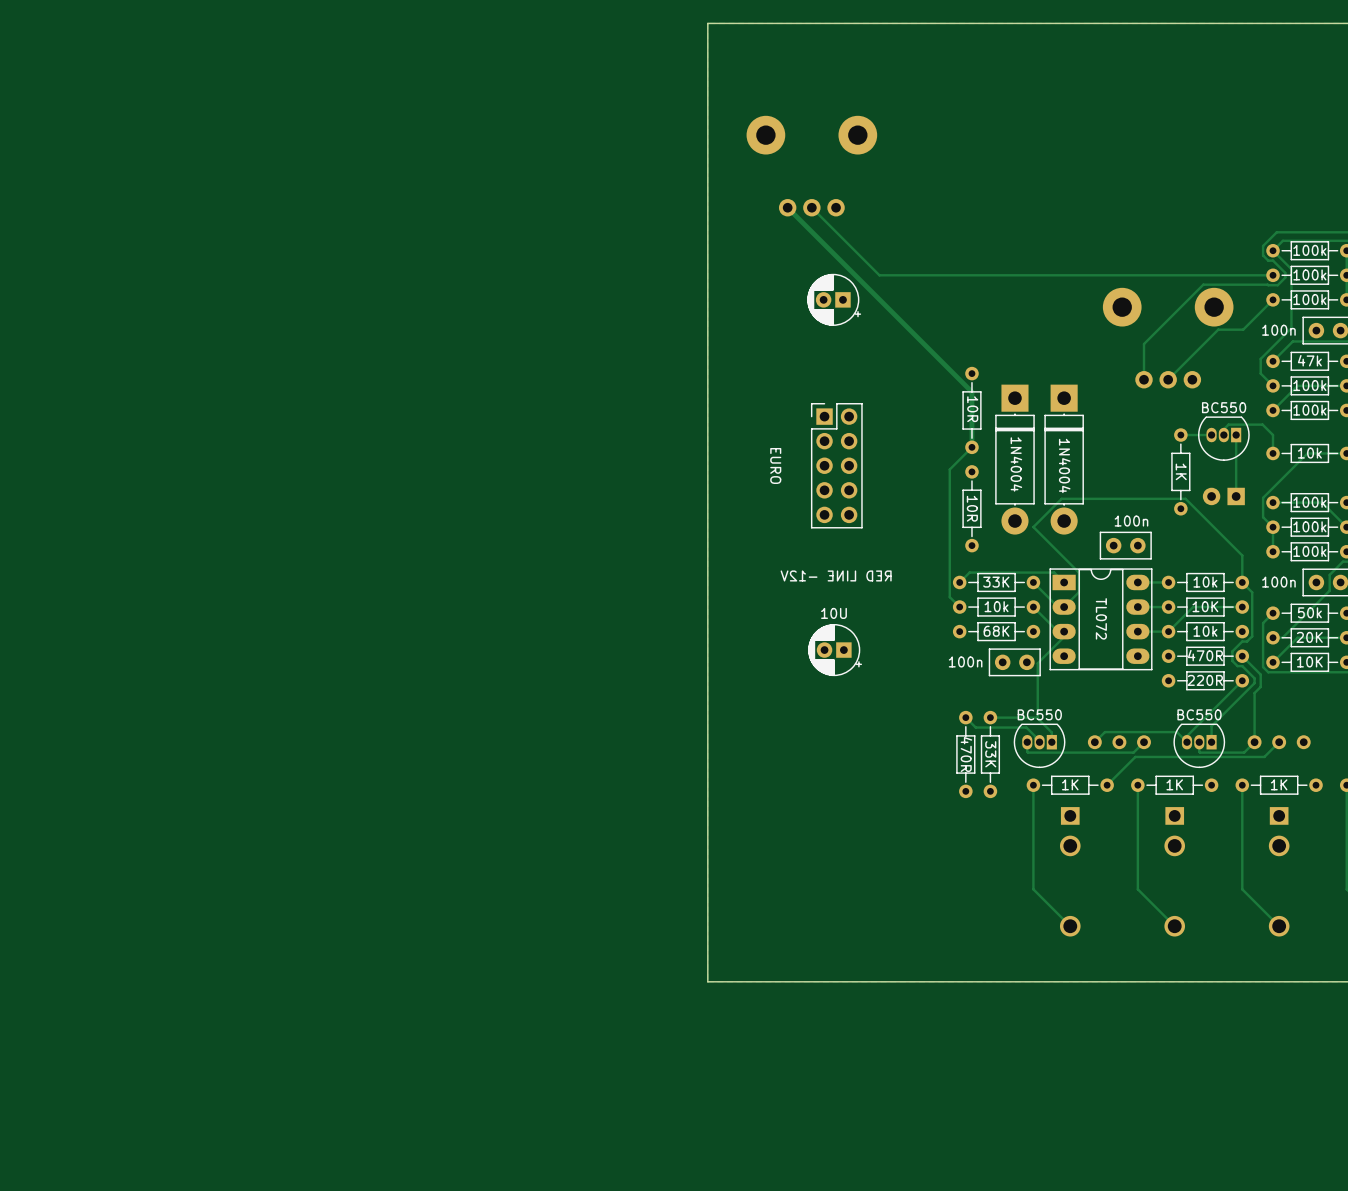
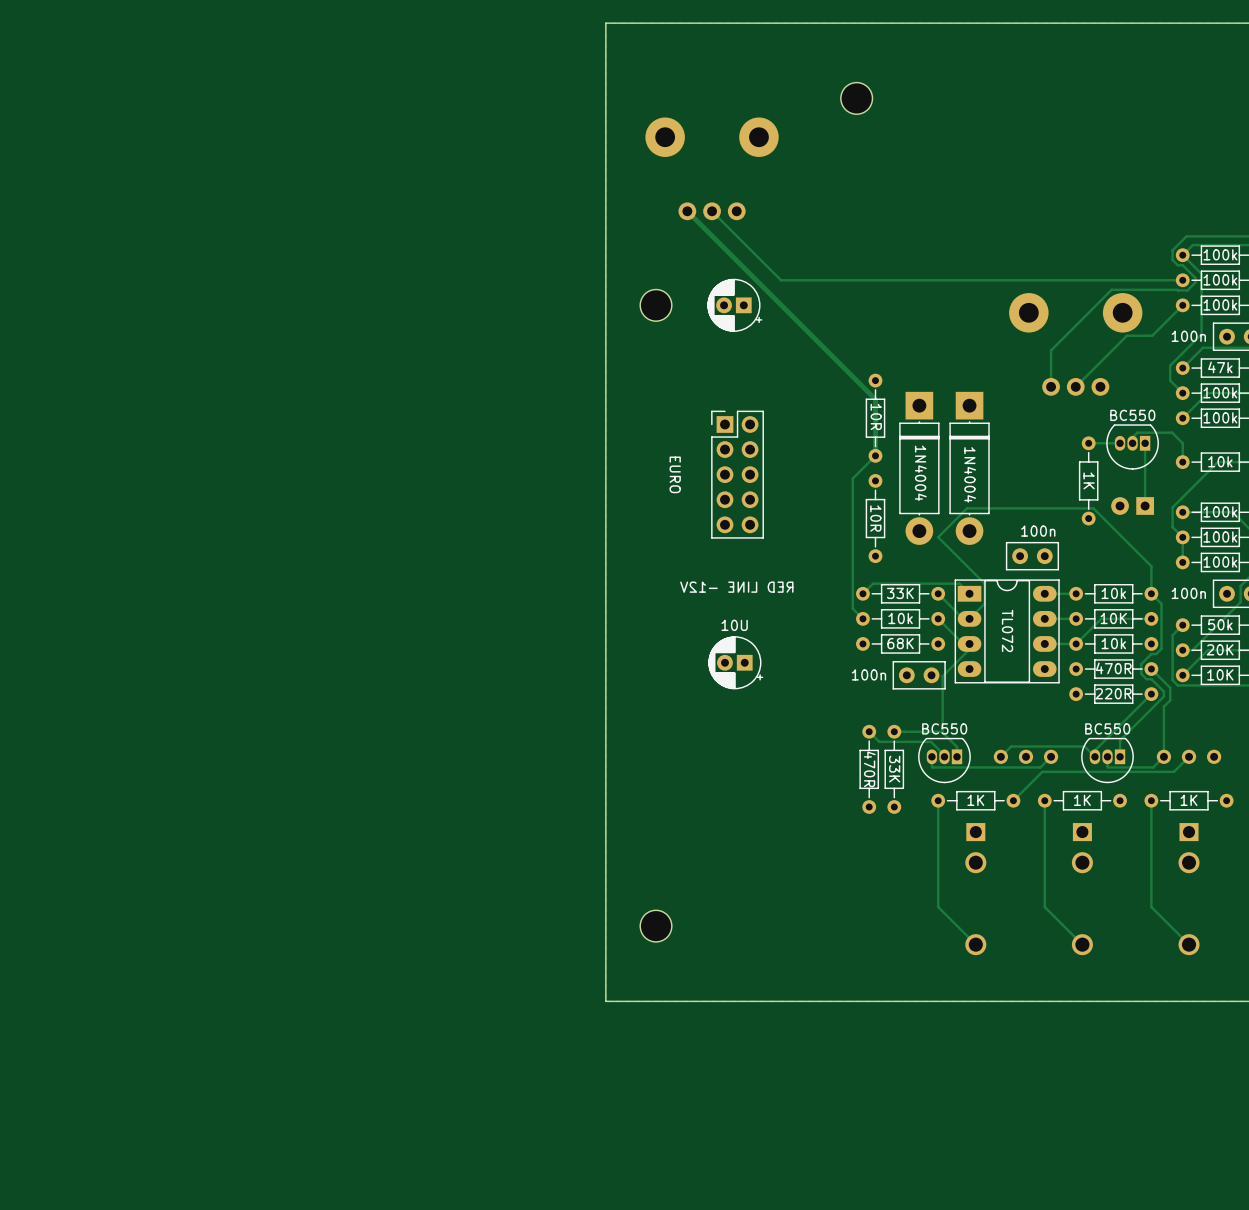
part: none -> (856, 98)
part: none -> (656, 305)
part: none -> (656, 926)

